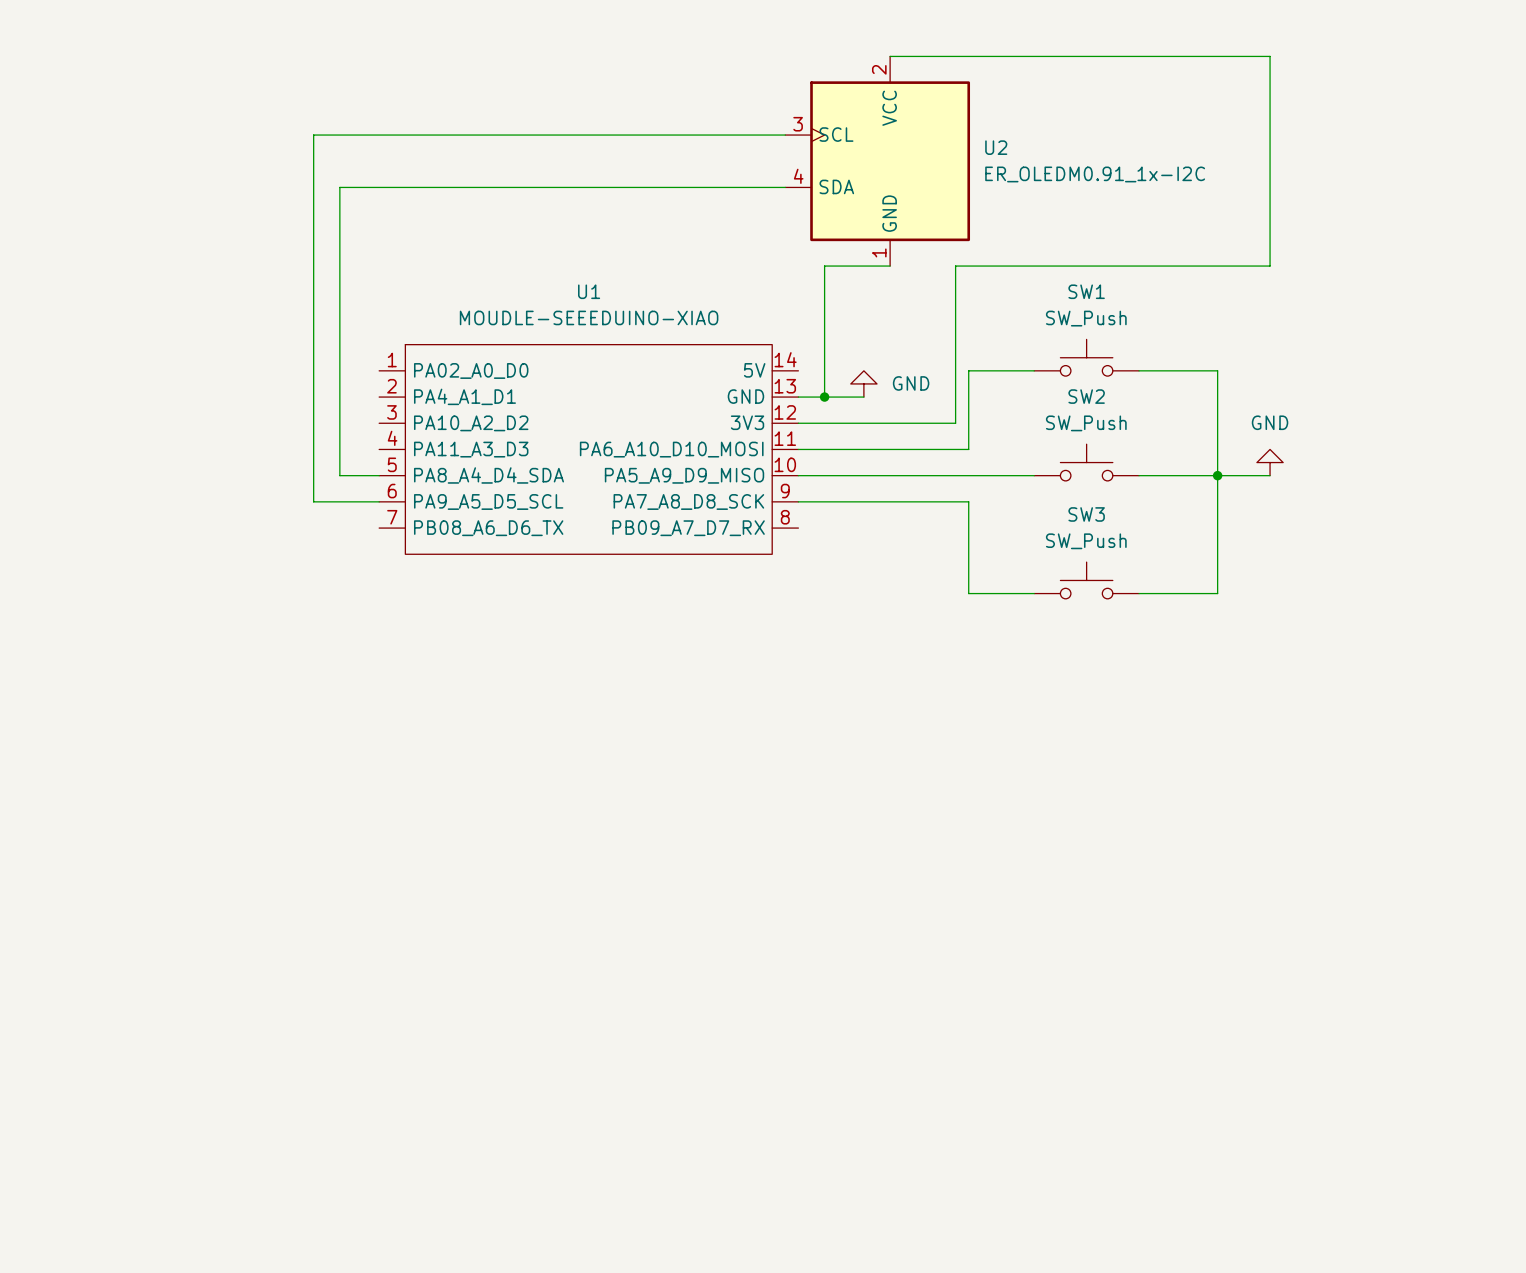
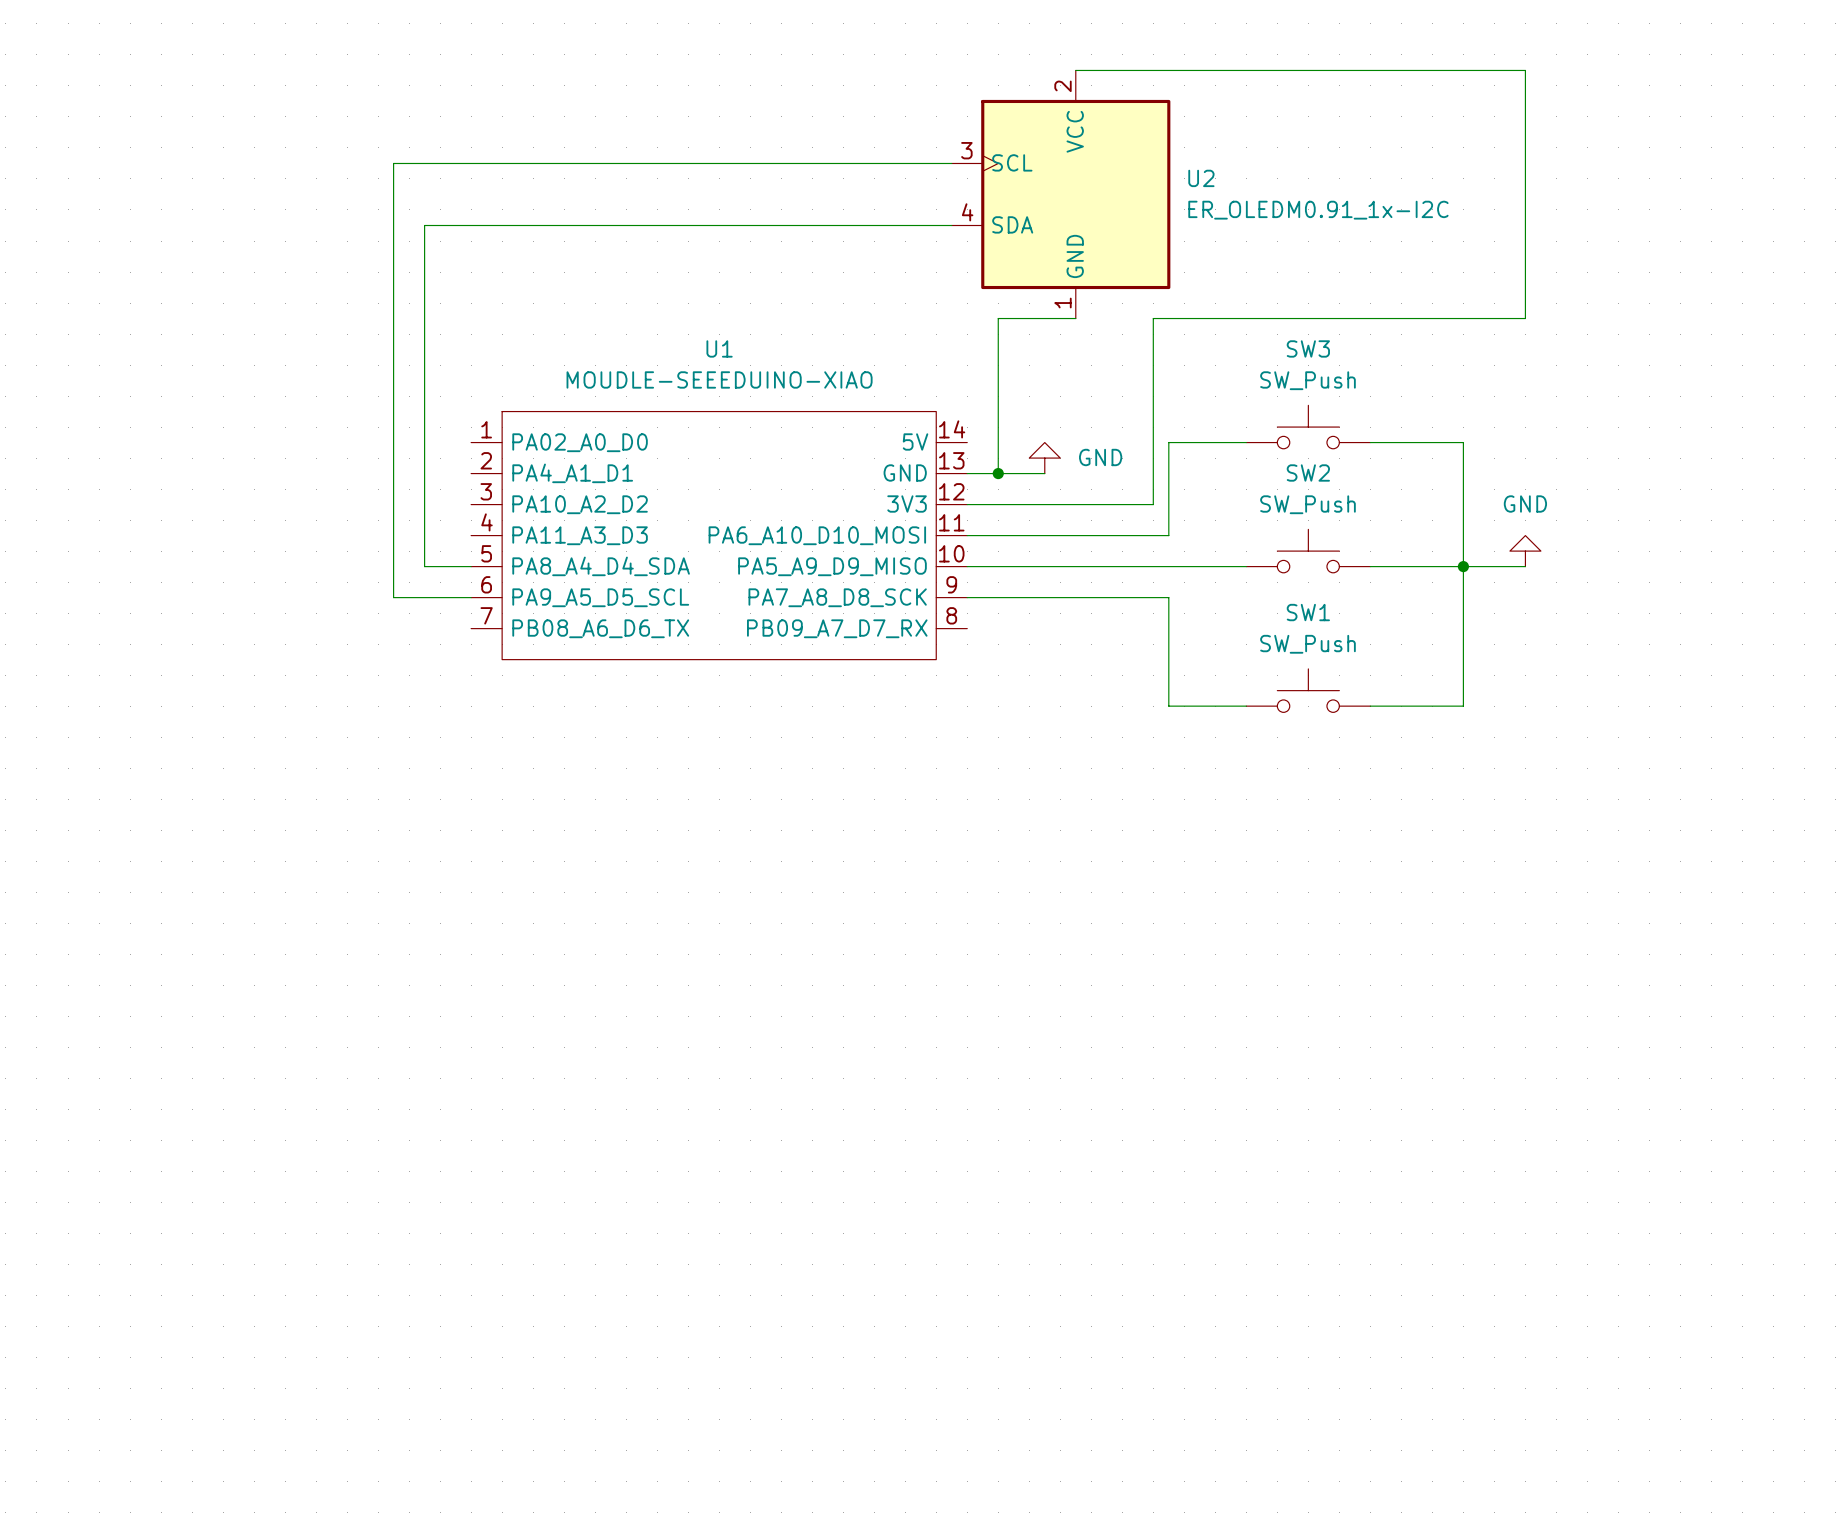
SW1 name: SW1 (1086, 291) -> SW3 (1308, 348)
SW3 name: SW3 (1086, 514) -> SW1 (1308, 612)

